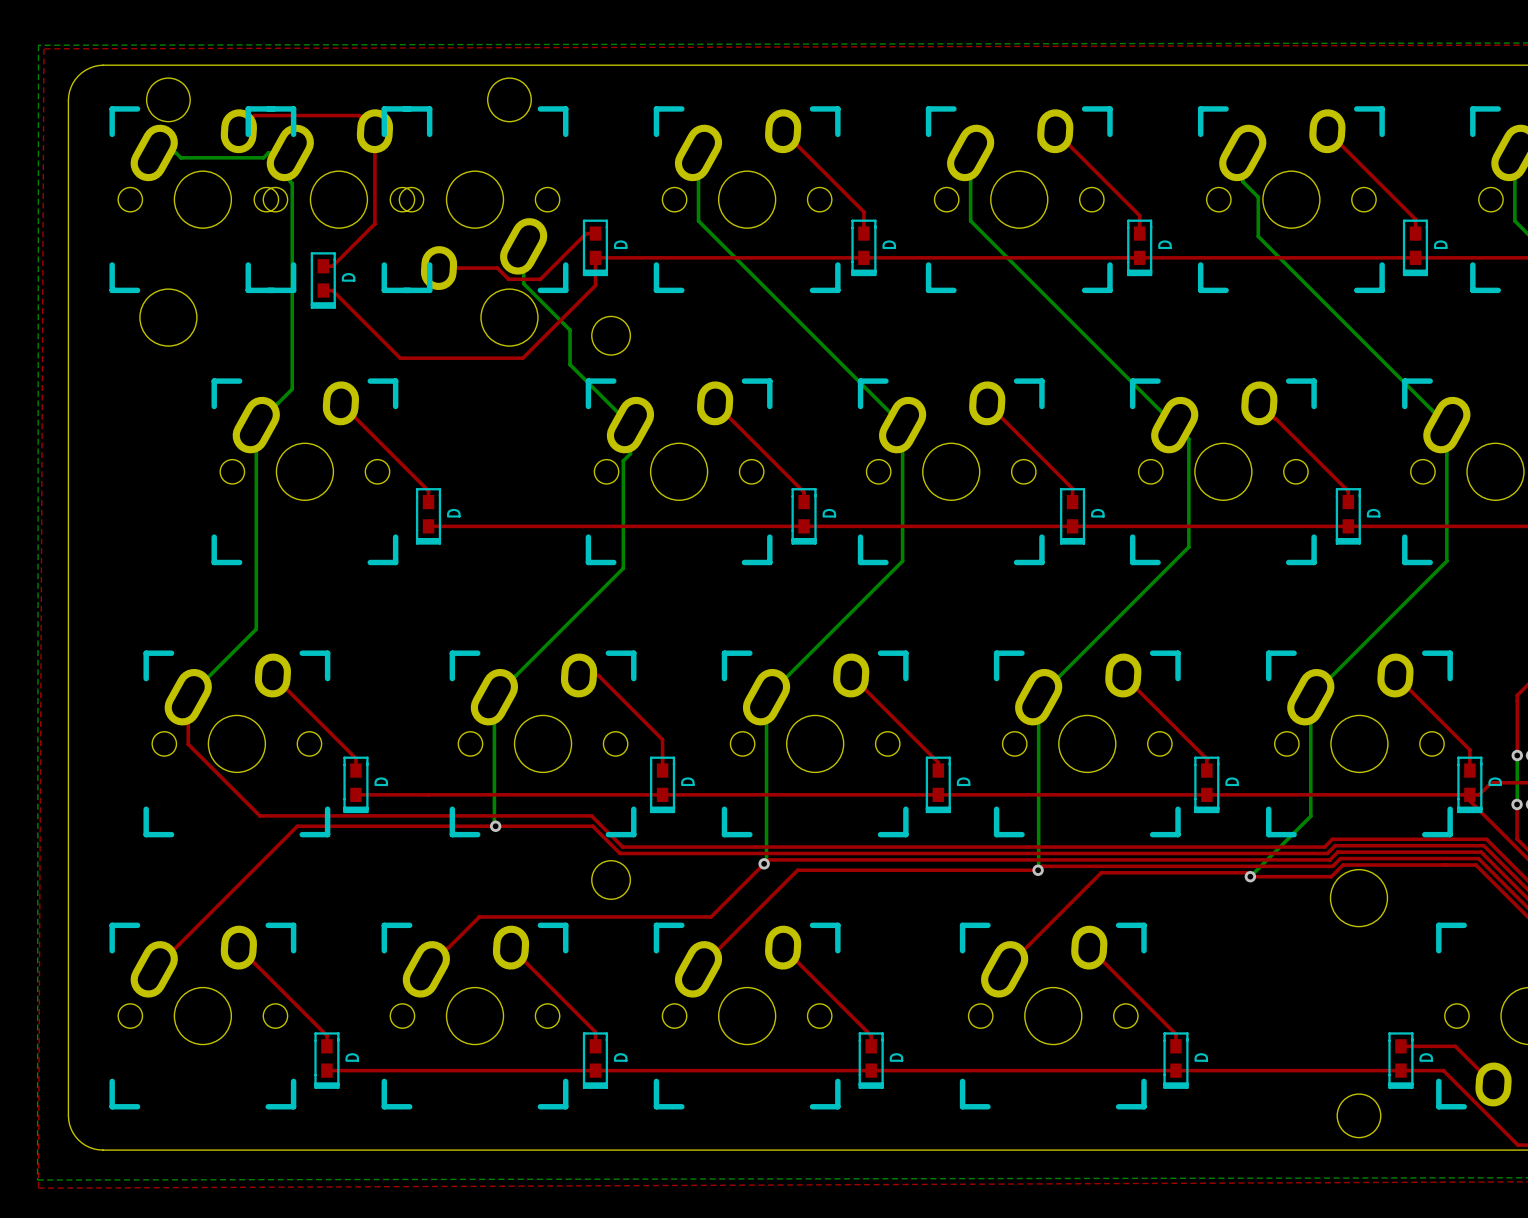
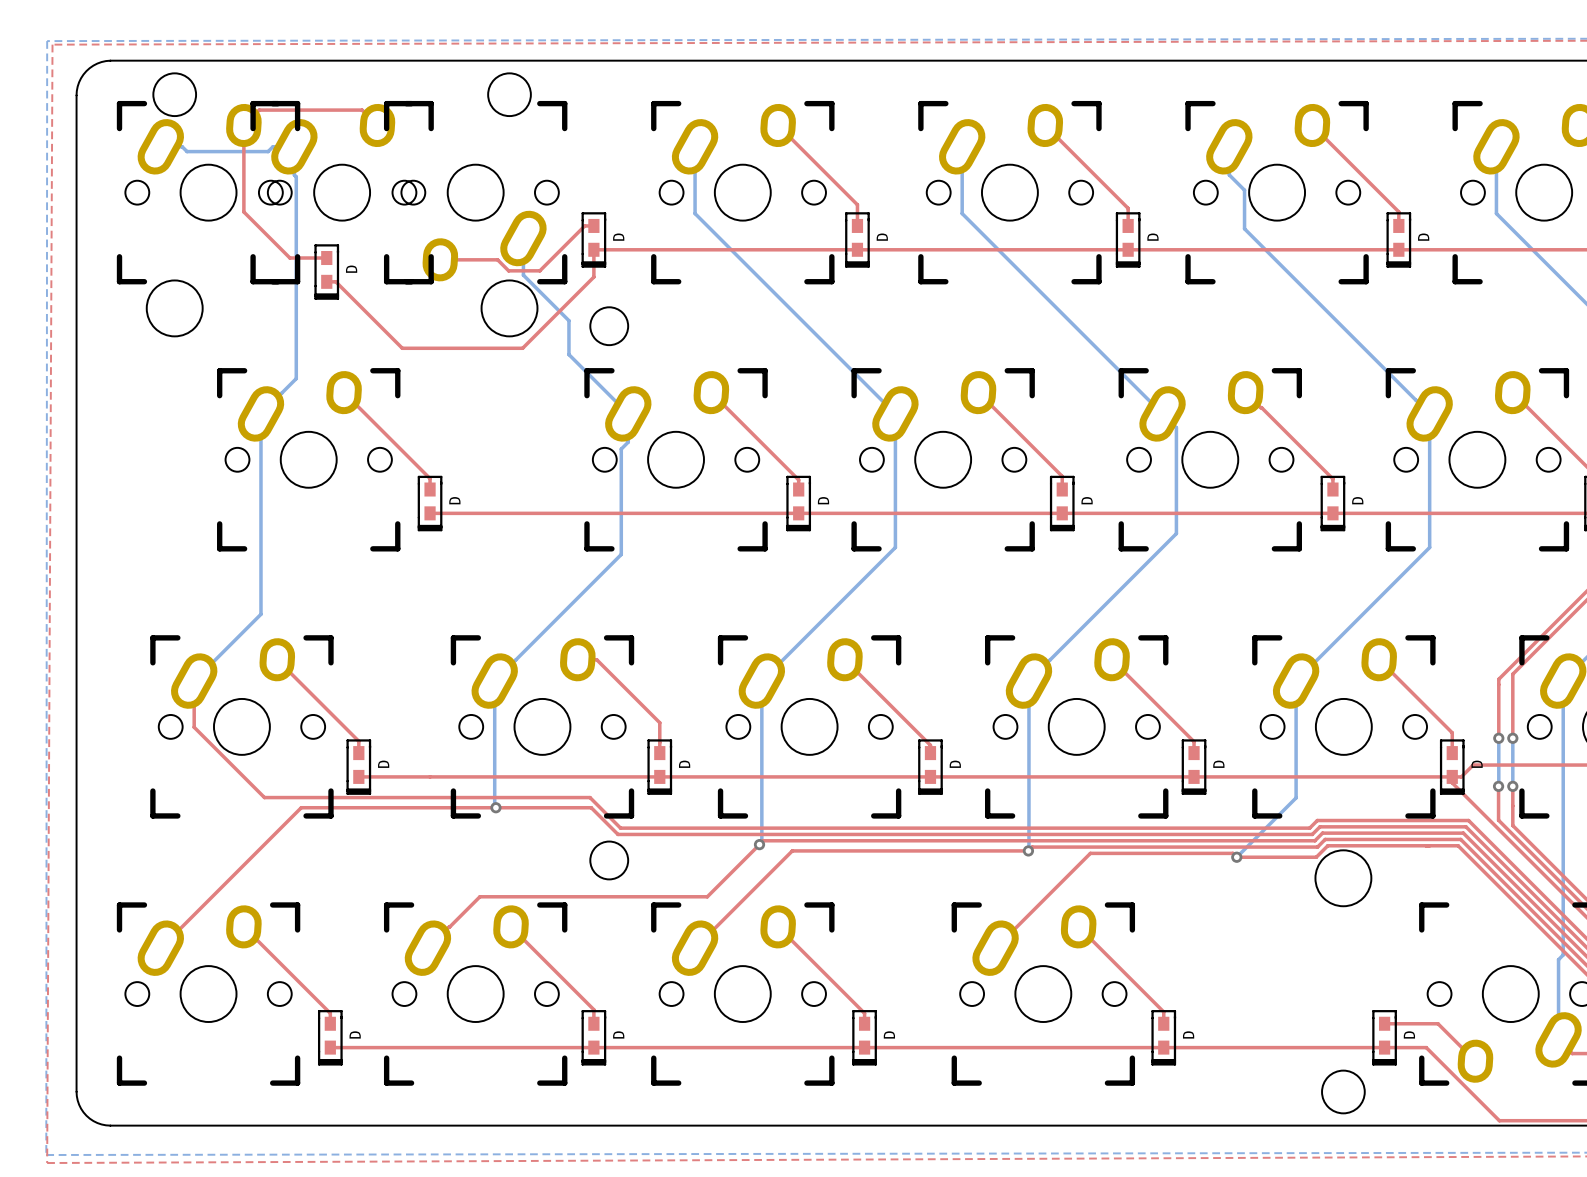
top track: (374, 131) (374, 223) (332, 266) (323, 266) -> (243, 125) (243, 211) (289, 258) (326, 258)

